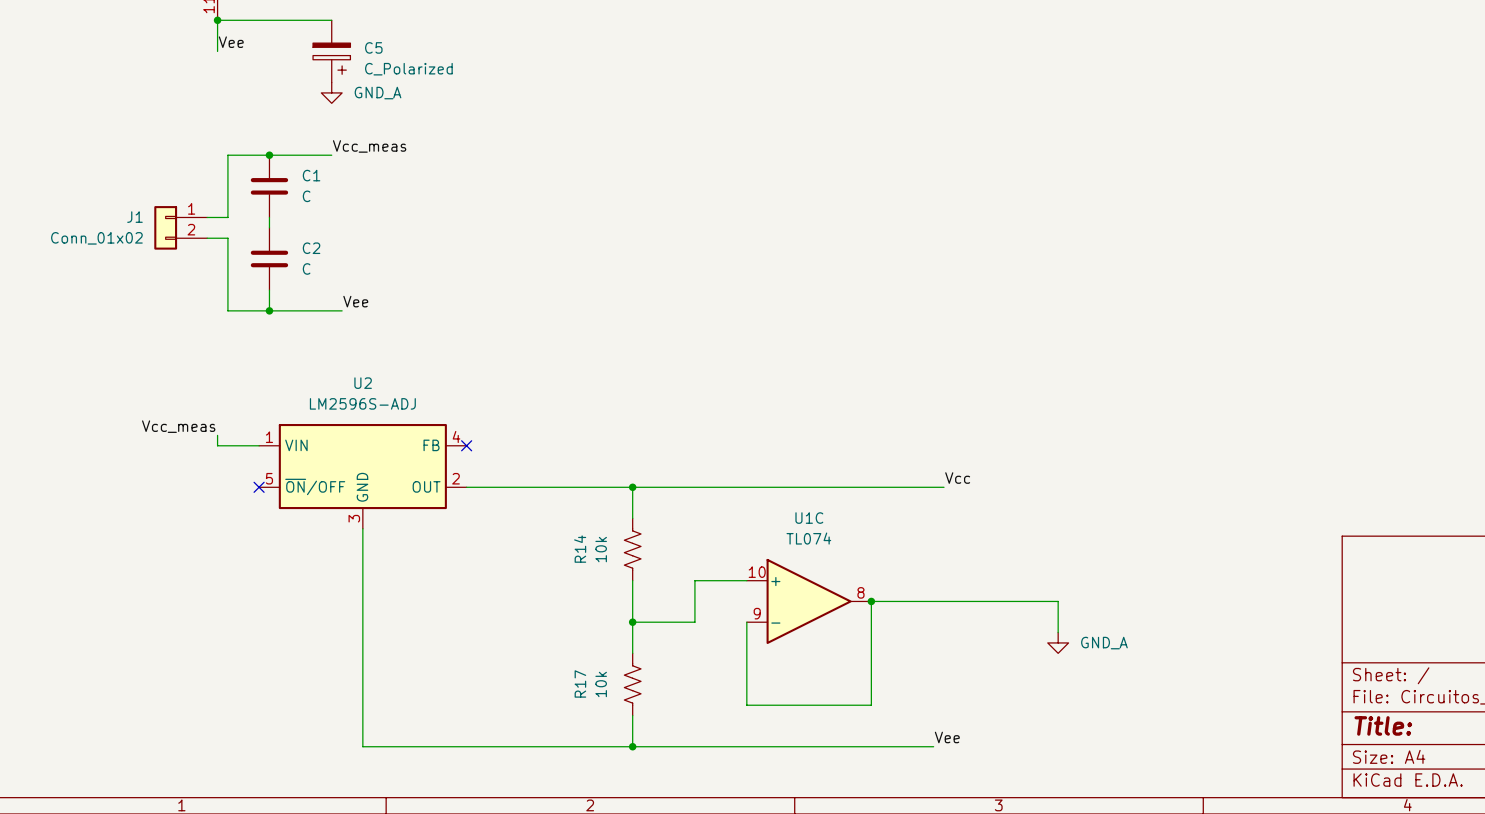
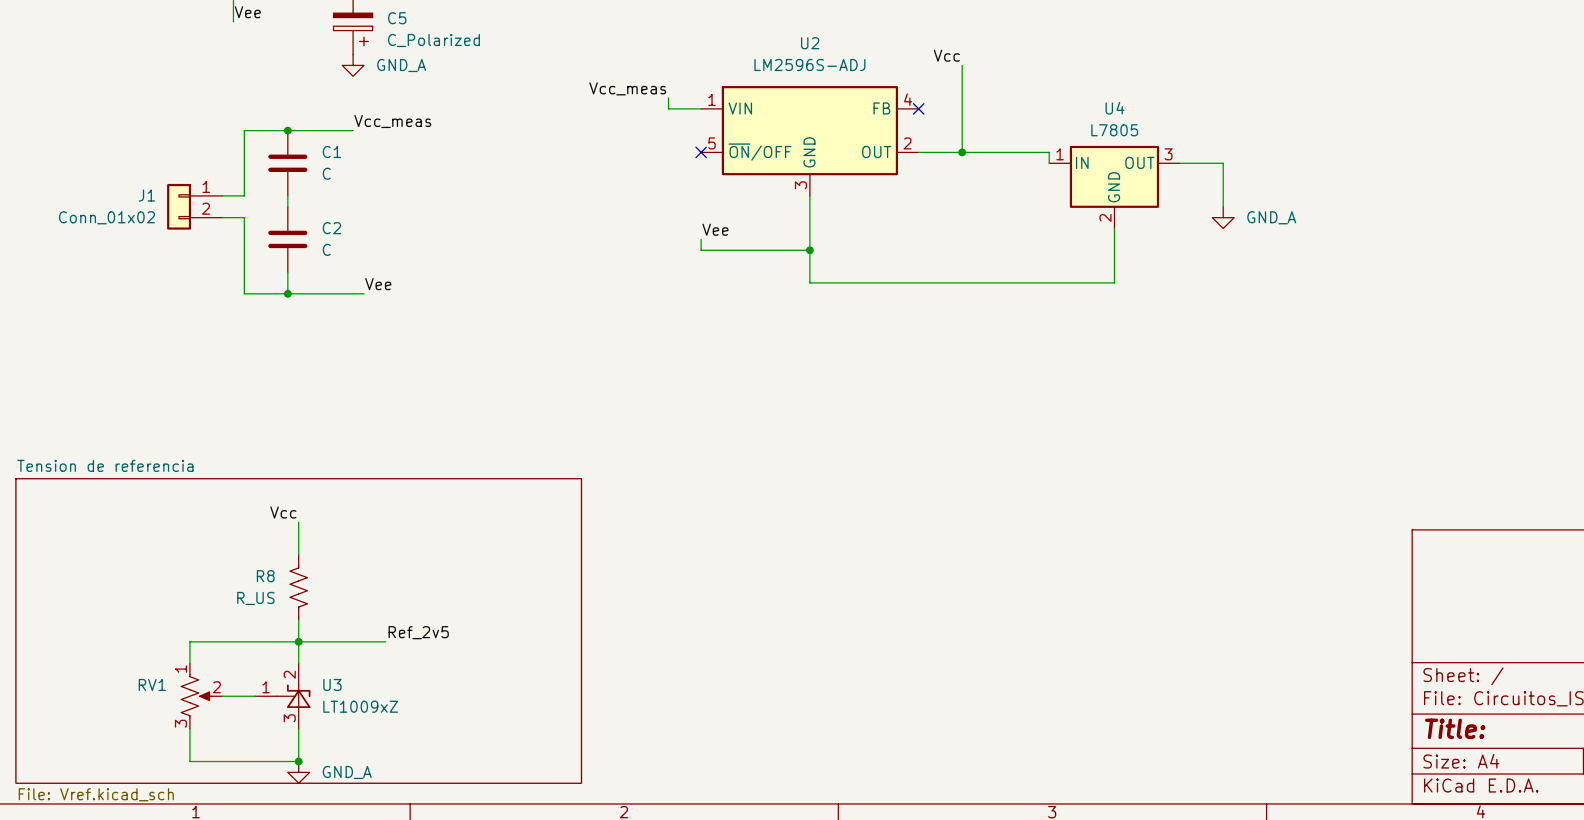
label: none -> Vcc (946, 55)
wire: none -> (962, 65) (962, 152)
label: none -> Vcc_meas (627, 88)
wire: none -> (668, 98) (668, 108) (701, 108)
no-connect mark: none -> (918, 108)
no-connect mark: none -> (701, 152)
wire: none -> (918, 152) (1049, 152) (1049, 163)
junction: none -> (962, 152)
wire: none -> (1179, 163) (1223, 163) (1223, 206)
U4: none -> L7805 (1114, 187)
wire: none -> (809, 195) (809, 282) (1114, 282) (1114, 228)
power symbol: none -> GND_A (1223, 217)
label: none -> Vee (715, 229)
wire: none -> (701, 239) (701, 250) (809, 250)
junction: none -> (809, 250)
label: Vcc_meas (178, 426) -> none
wire: (217, 435) (217, 445) (259, 445) -> none
no-connect mark: (466, 445) -> none
U2 position: (362, 476) -> (809, 140)
label: Vcc (957, 478) -> none
no-connect mark: (259, 487) -> none
wire: (466, 487) (944, 487) -> none
wire: (632, 487) (632, 518) -> none
junction: (632, 487) -> none
label: none -> Vcc (283, 512)
wire: none -> (298, 522) (298, 554)
wire: (362, 528) (362, 746) (933, 746) -> none
R14: 10k (632, 549) -> none
wire: (632, 580) (632, 653) -> none
wire: (746, 580) (694, 580) (694, 622) (632, 622) -> none
R8: none -> R_US (298, 587)
U1C: TL074 (809, 601) -> none
junction: (871, 601) -> none
wire: none -> (298, 620) (298, 663)
junction: (632, 622) -> none
wire: (746, 622) (746, 705) (871, 705) (871, 601) (1058, 601) (1058, 632) -> none
sheet Tension de referencia: none -> File: Vref.kicad_sch (298, 630)
label: none -> Ref_2v5 (418, 632)
junction: none -> (298, 641)
wire: none -> (385, 641) (189, 641) (189, 663)
power symbol: GND_A (1058, 642) -> none
R17: 10k (632, 684) -> none
RV1: none -> (201, 696)
wire: none -> (222, 696) (255, 696)
U3: none -> LT1009xZ (282, 696)
wire: (632, 715) (632, 746) -> none
wire: none -> (189, 728) (189, 761) (298, 761) (298, 728)
label: Vee (947, 737) -> none
junction: (632, 746) -> none
junction: none -> (298, 761)
power symbol: none -> GND_A (298, 772)

